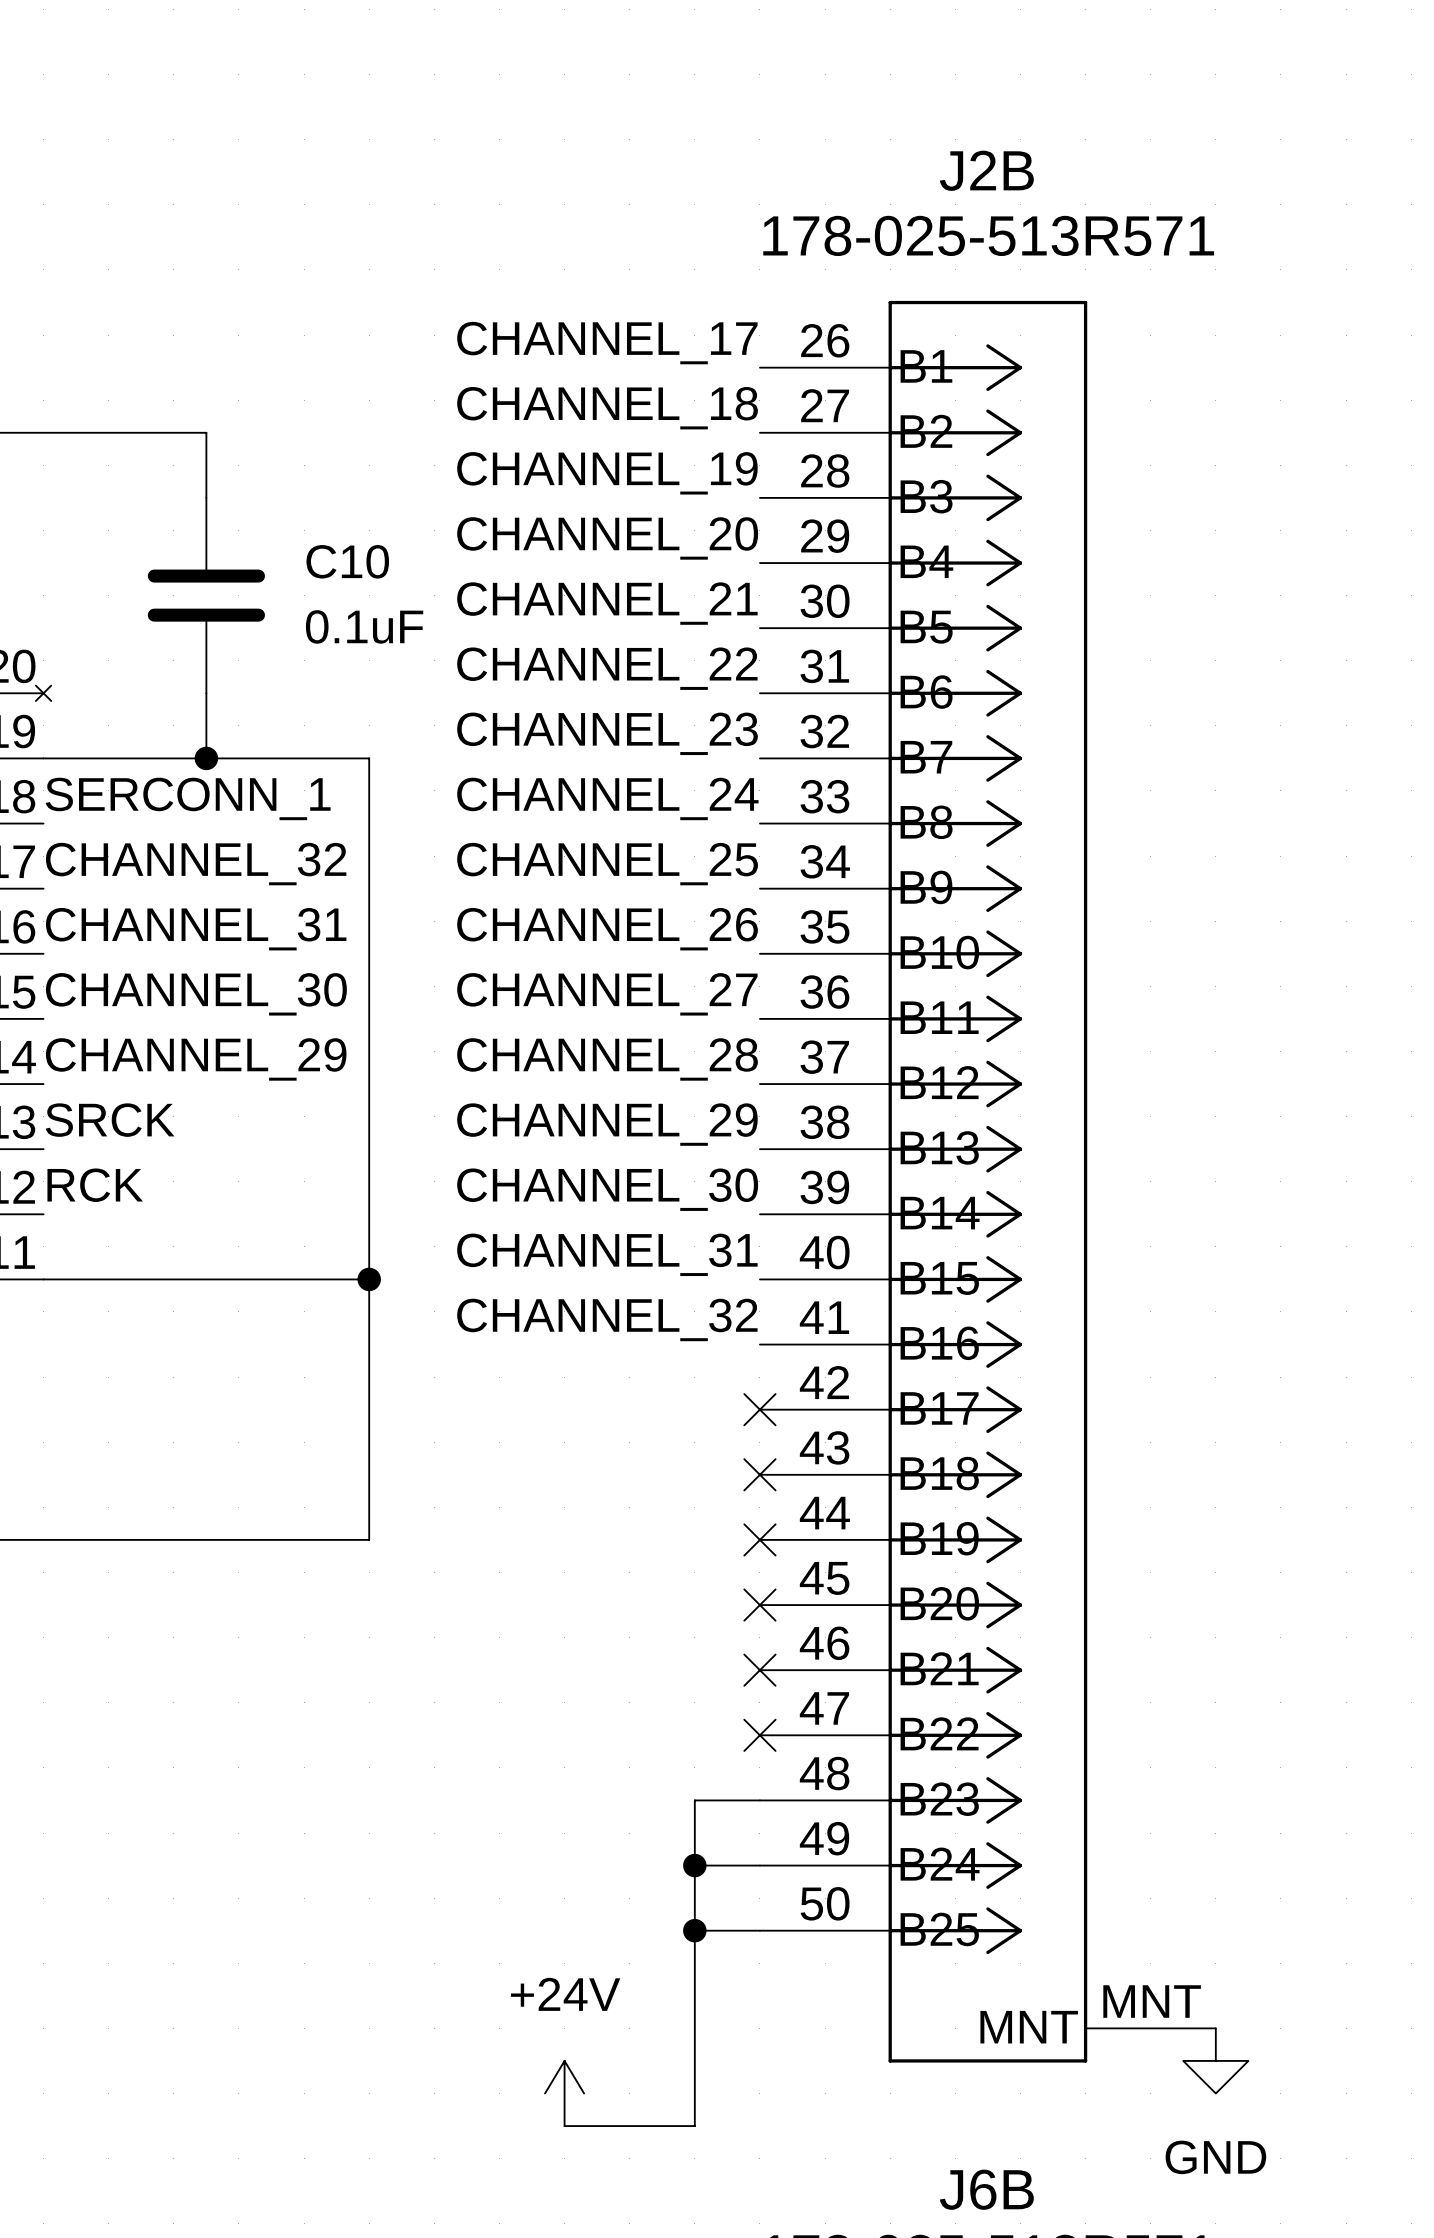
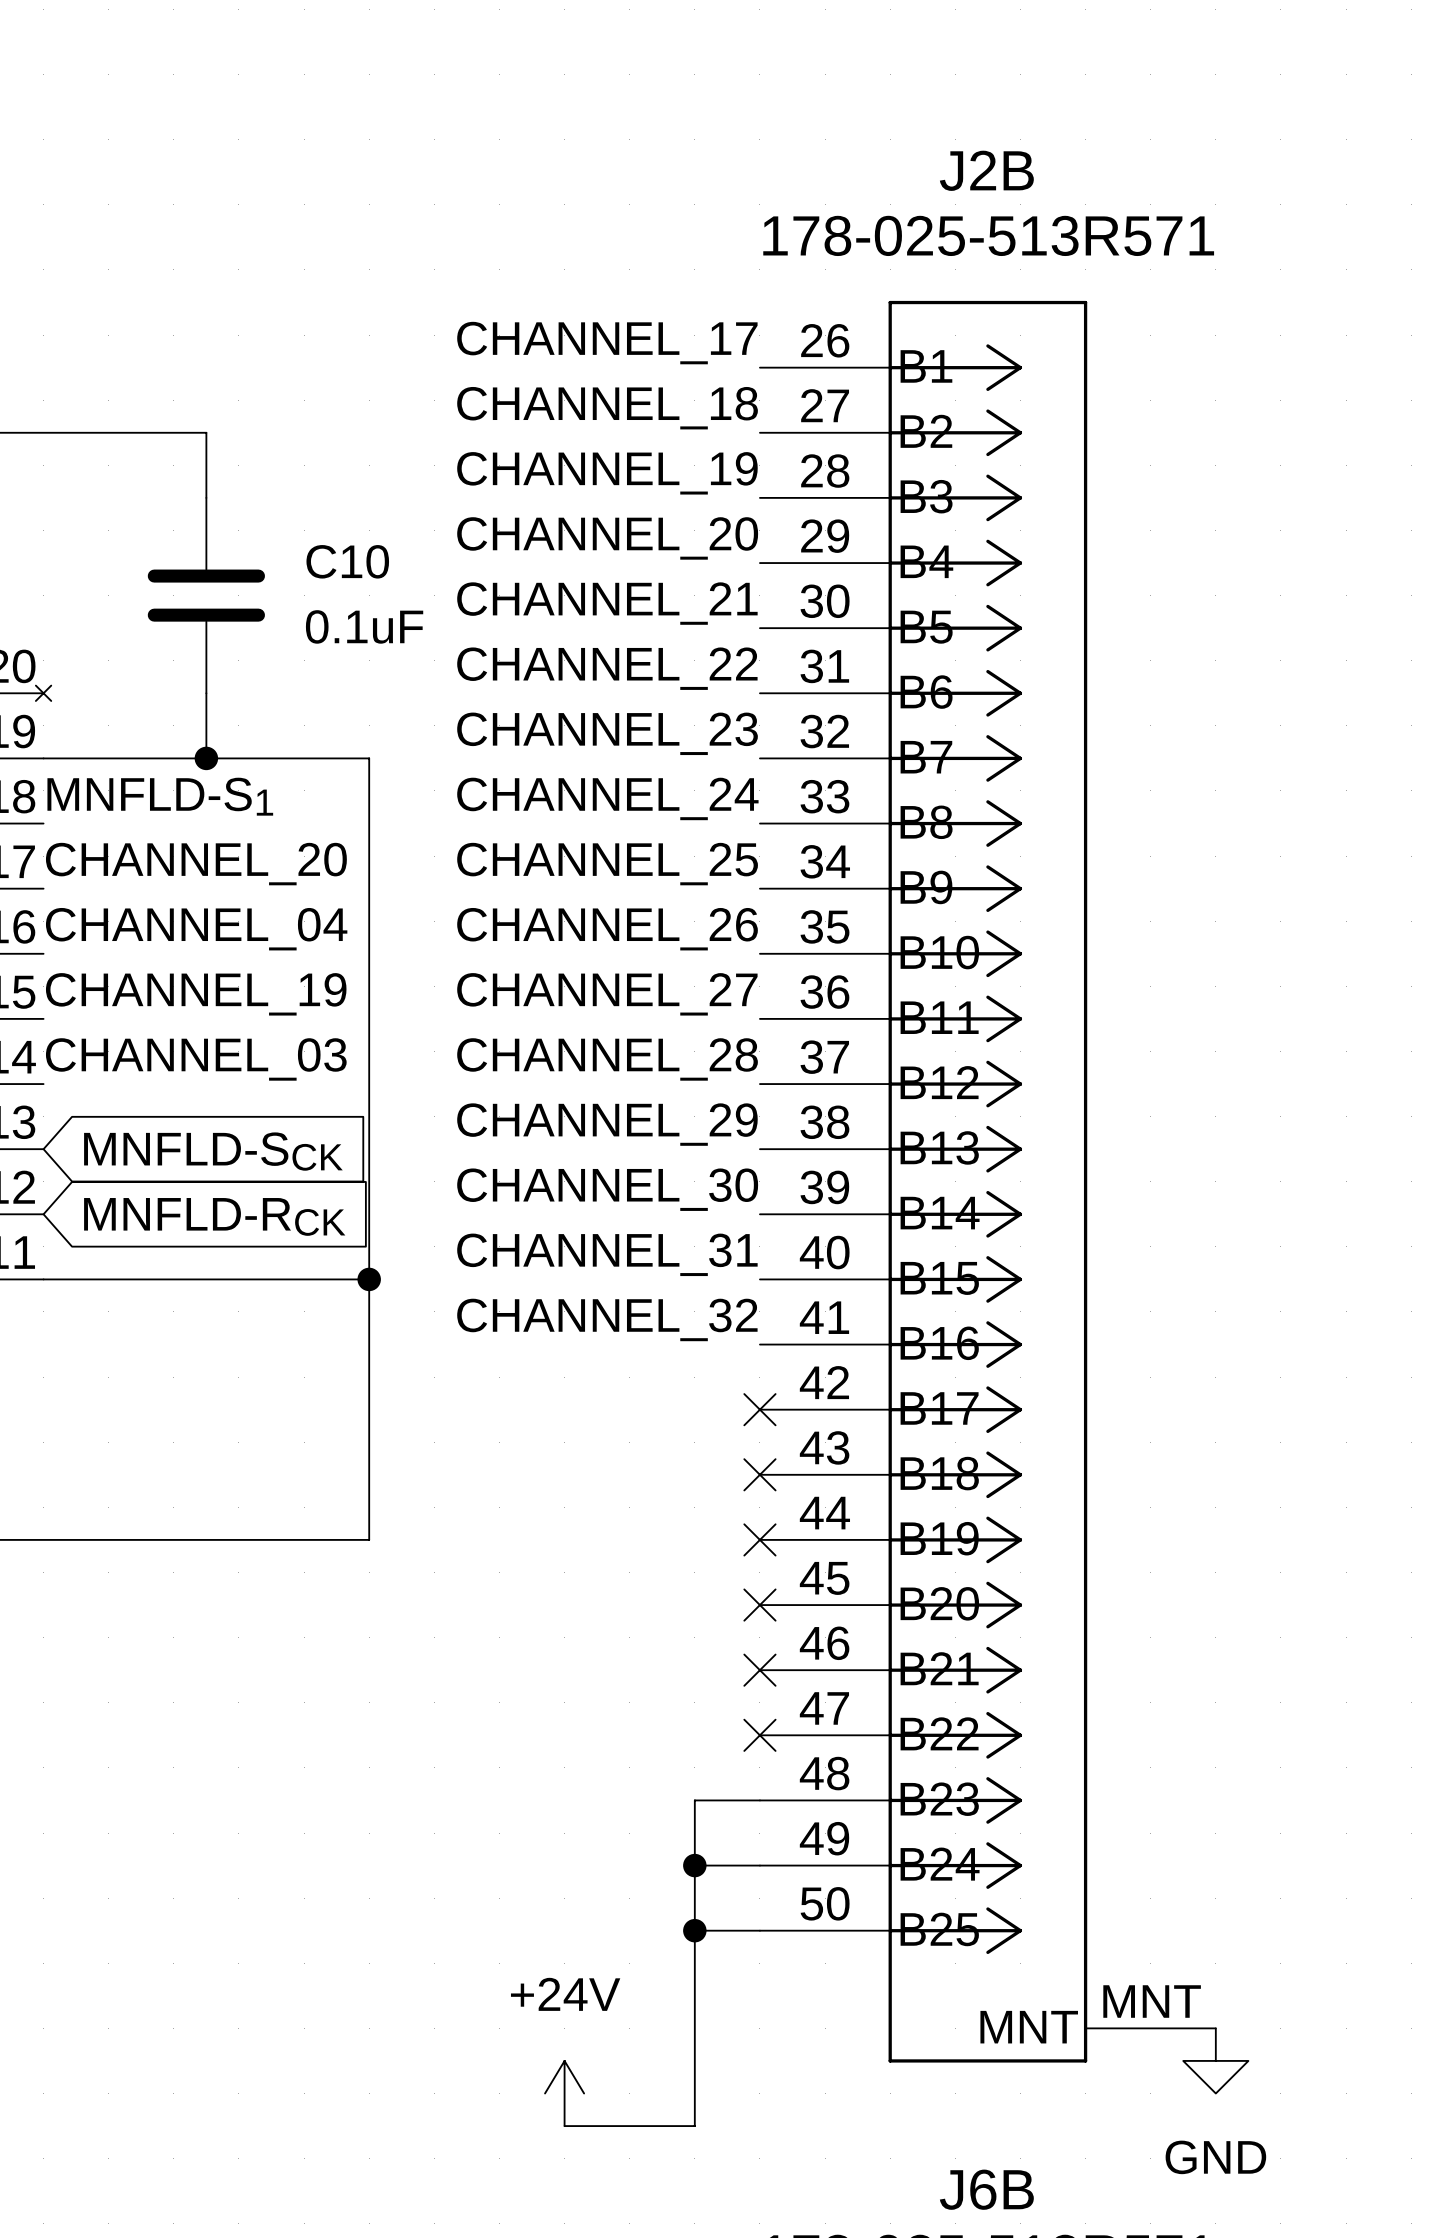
label: SERCONN_1 (188, 798) -> MNFLD-S1 (160, 796)
label: CHANNEL_32 (196, 864) -> CHANNEL_20 (196, 864)
label: CHANNEL_31 (196, 929) -> CHANNEL_04 (196, 929)
label: CHANNEL_30 (196, 994) -> CHANNEL_19 (196, 994)
label: CHANNEL_29 (196, 1059) -> CHANNEL_03 (196, 1059)
label: SRCK (110, 1120) -> none
global label: none -> MNFLD-SCK (213, 1151)
label: RCK (95, 1185) -> none
global label: none -> MNFLD-RCK (214, 1216)

